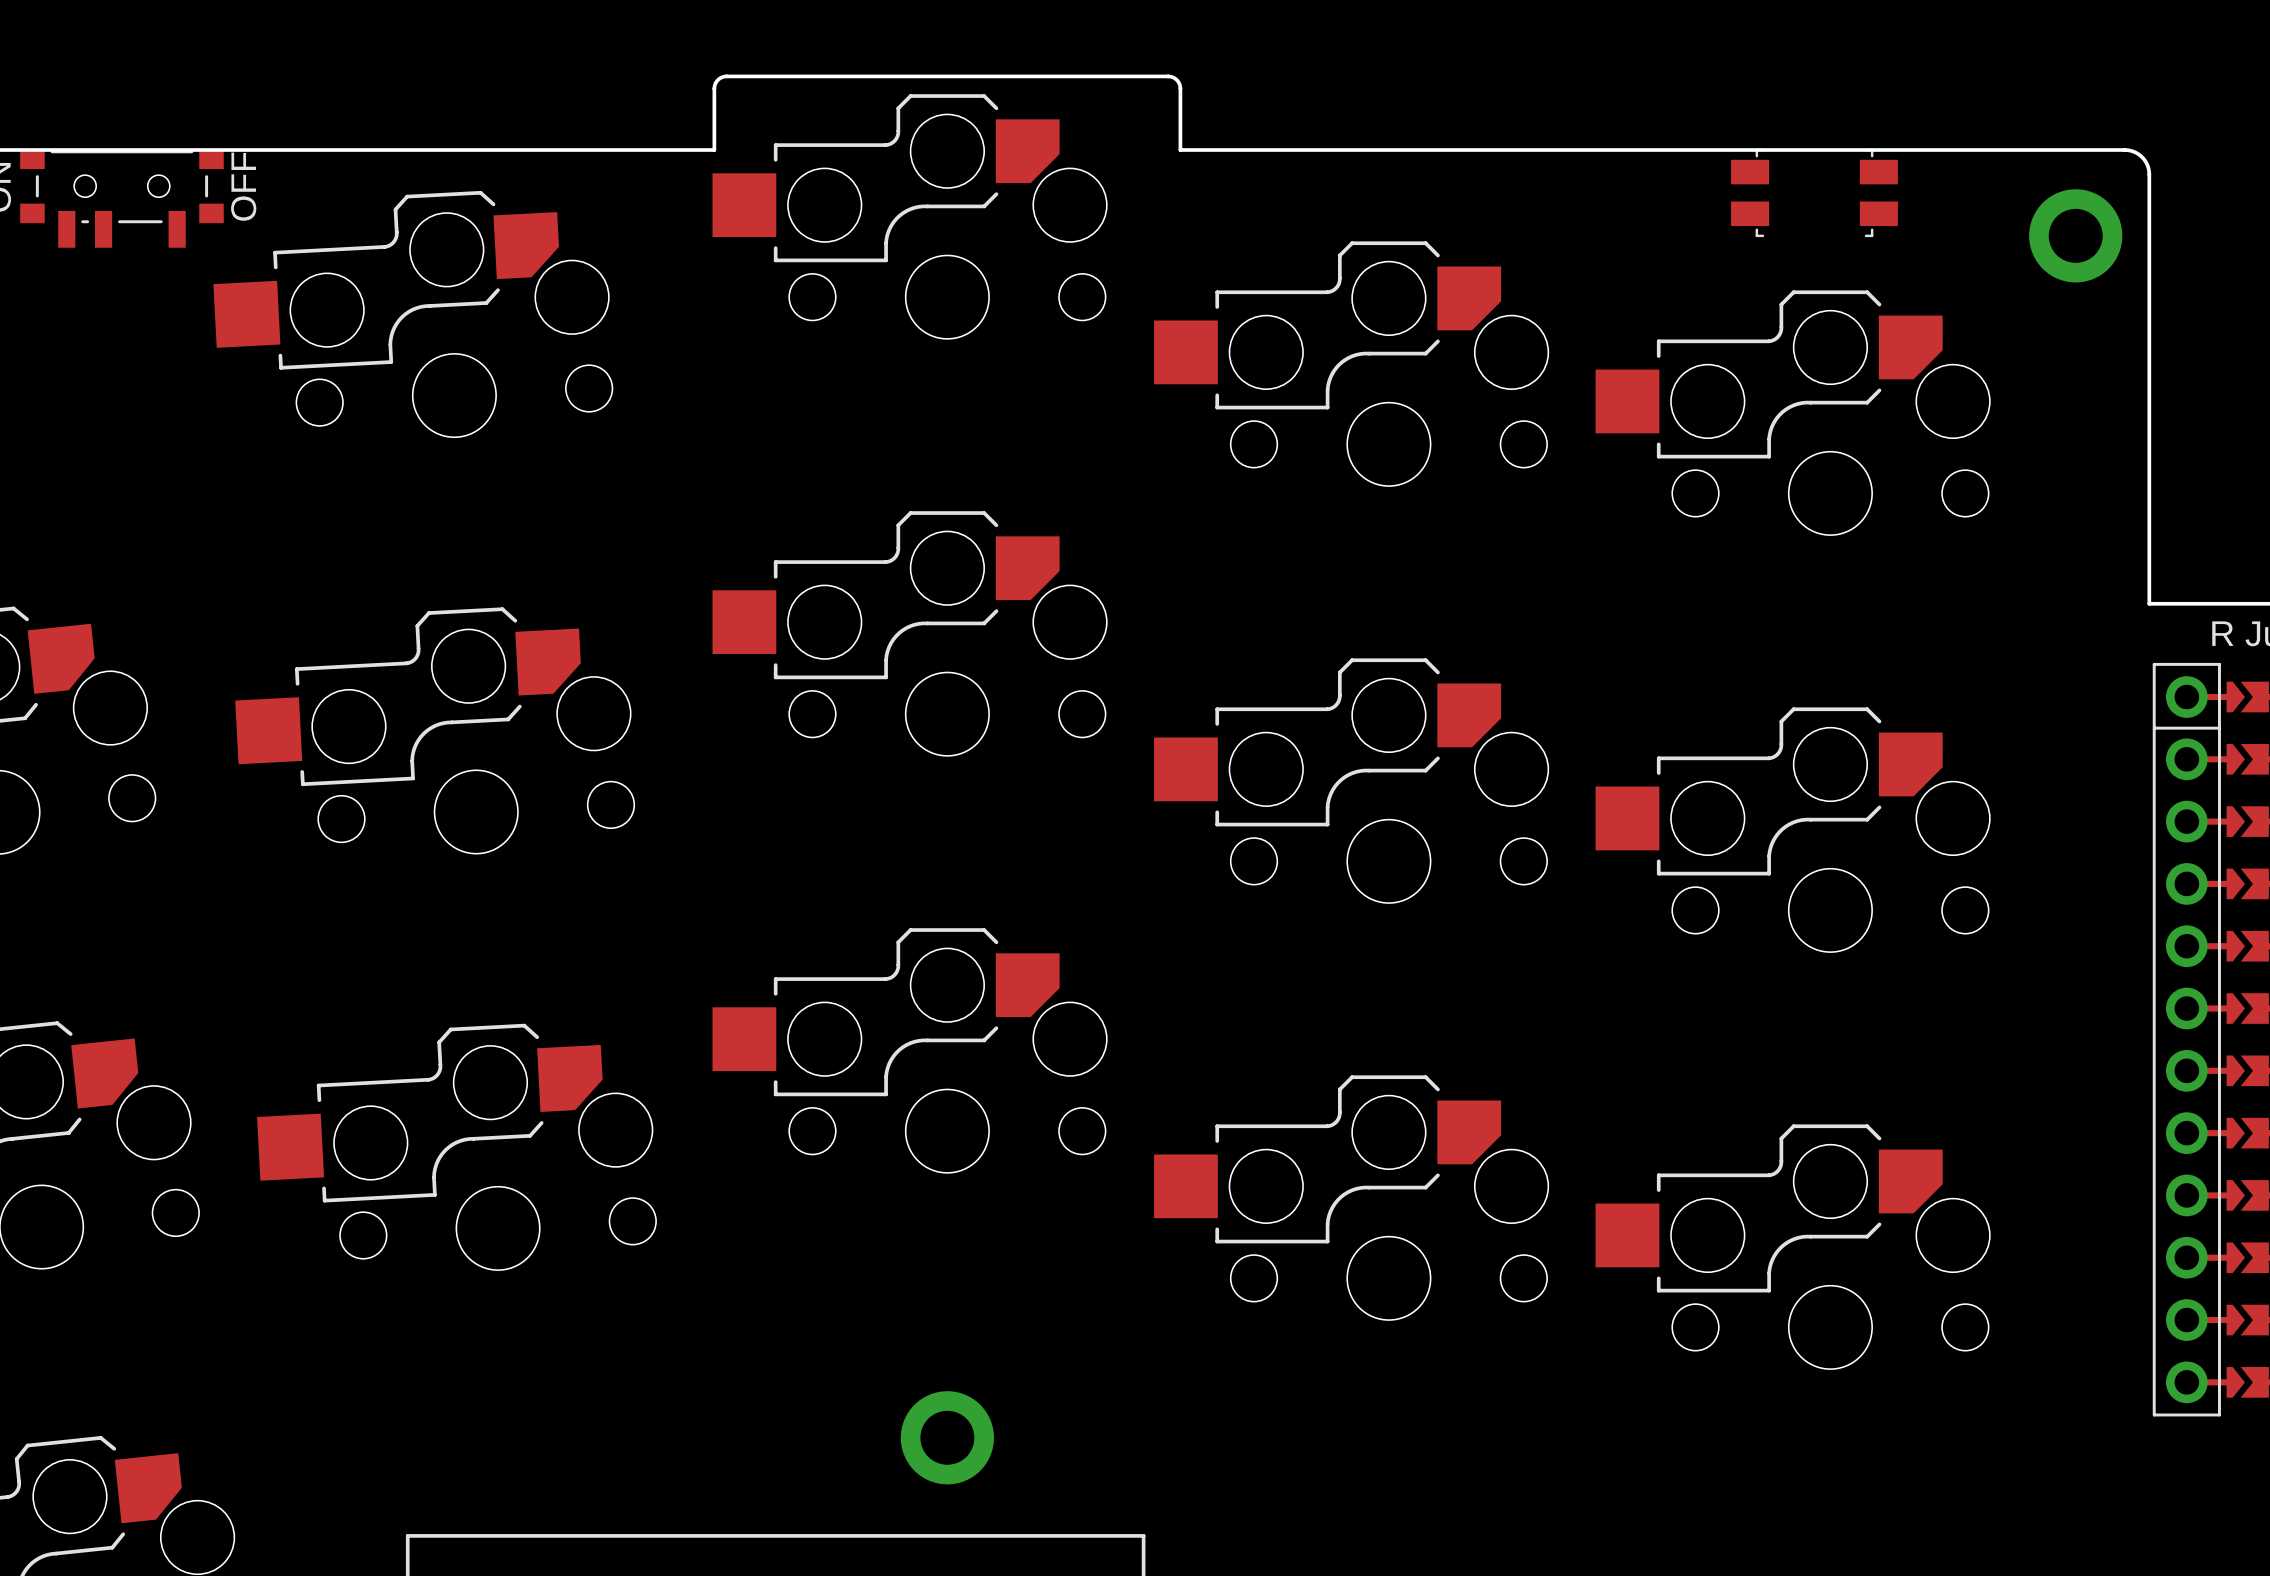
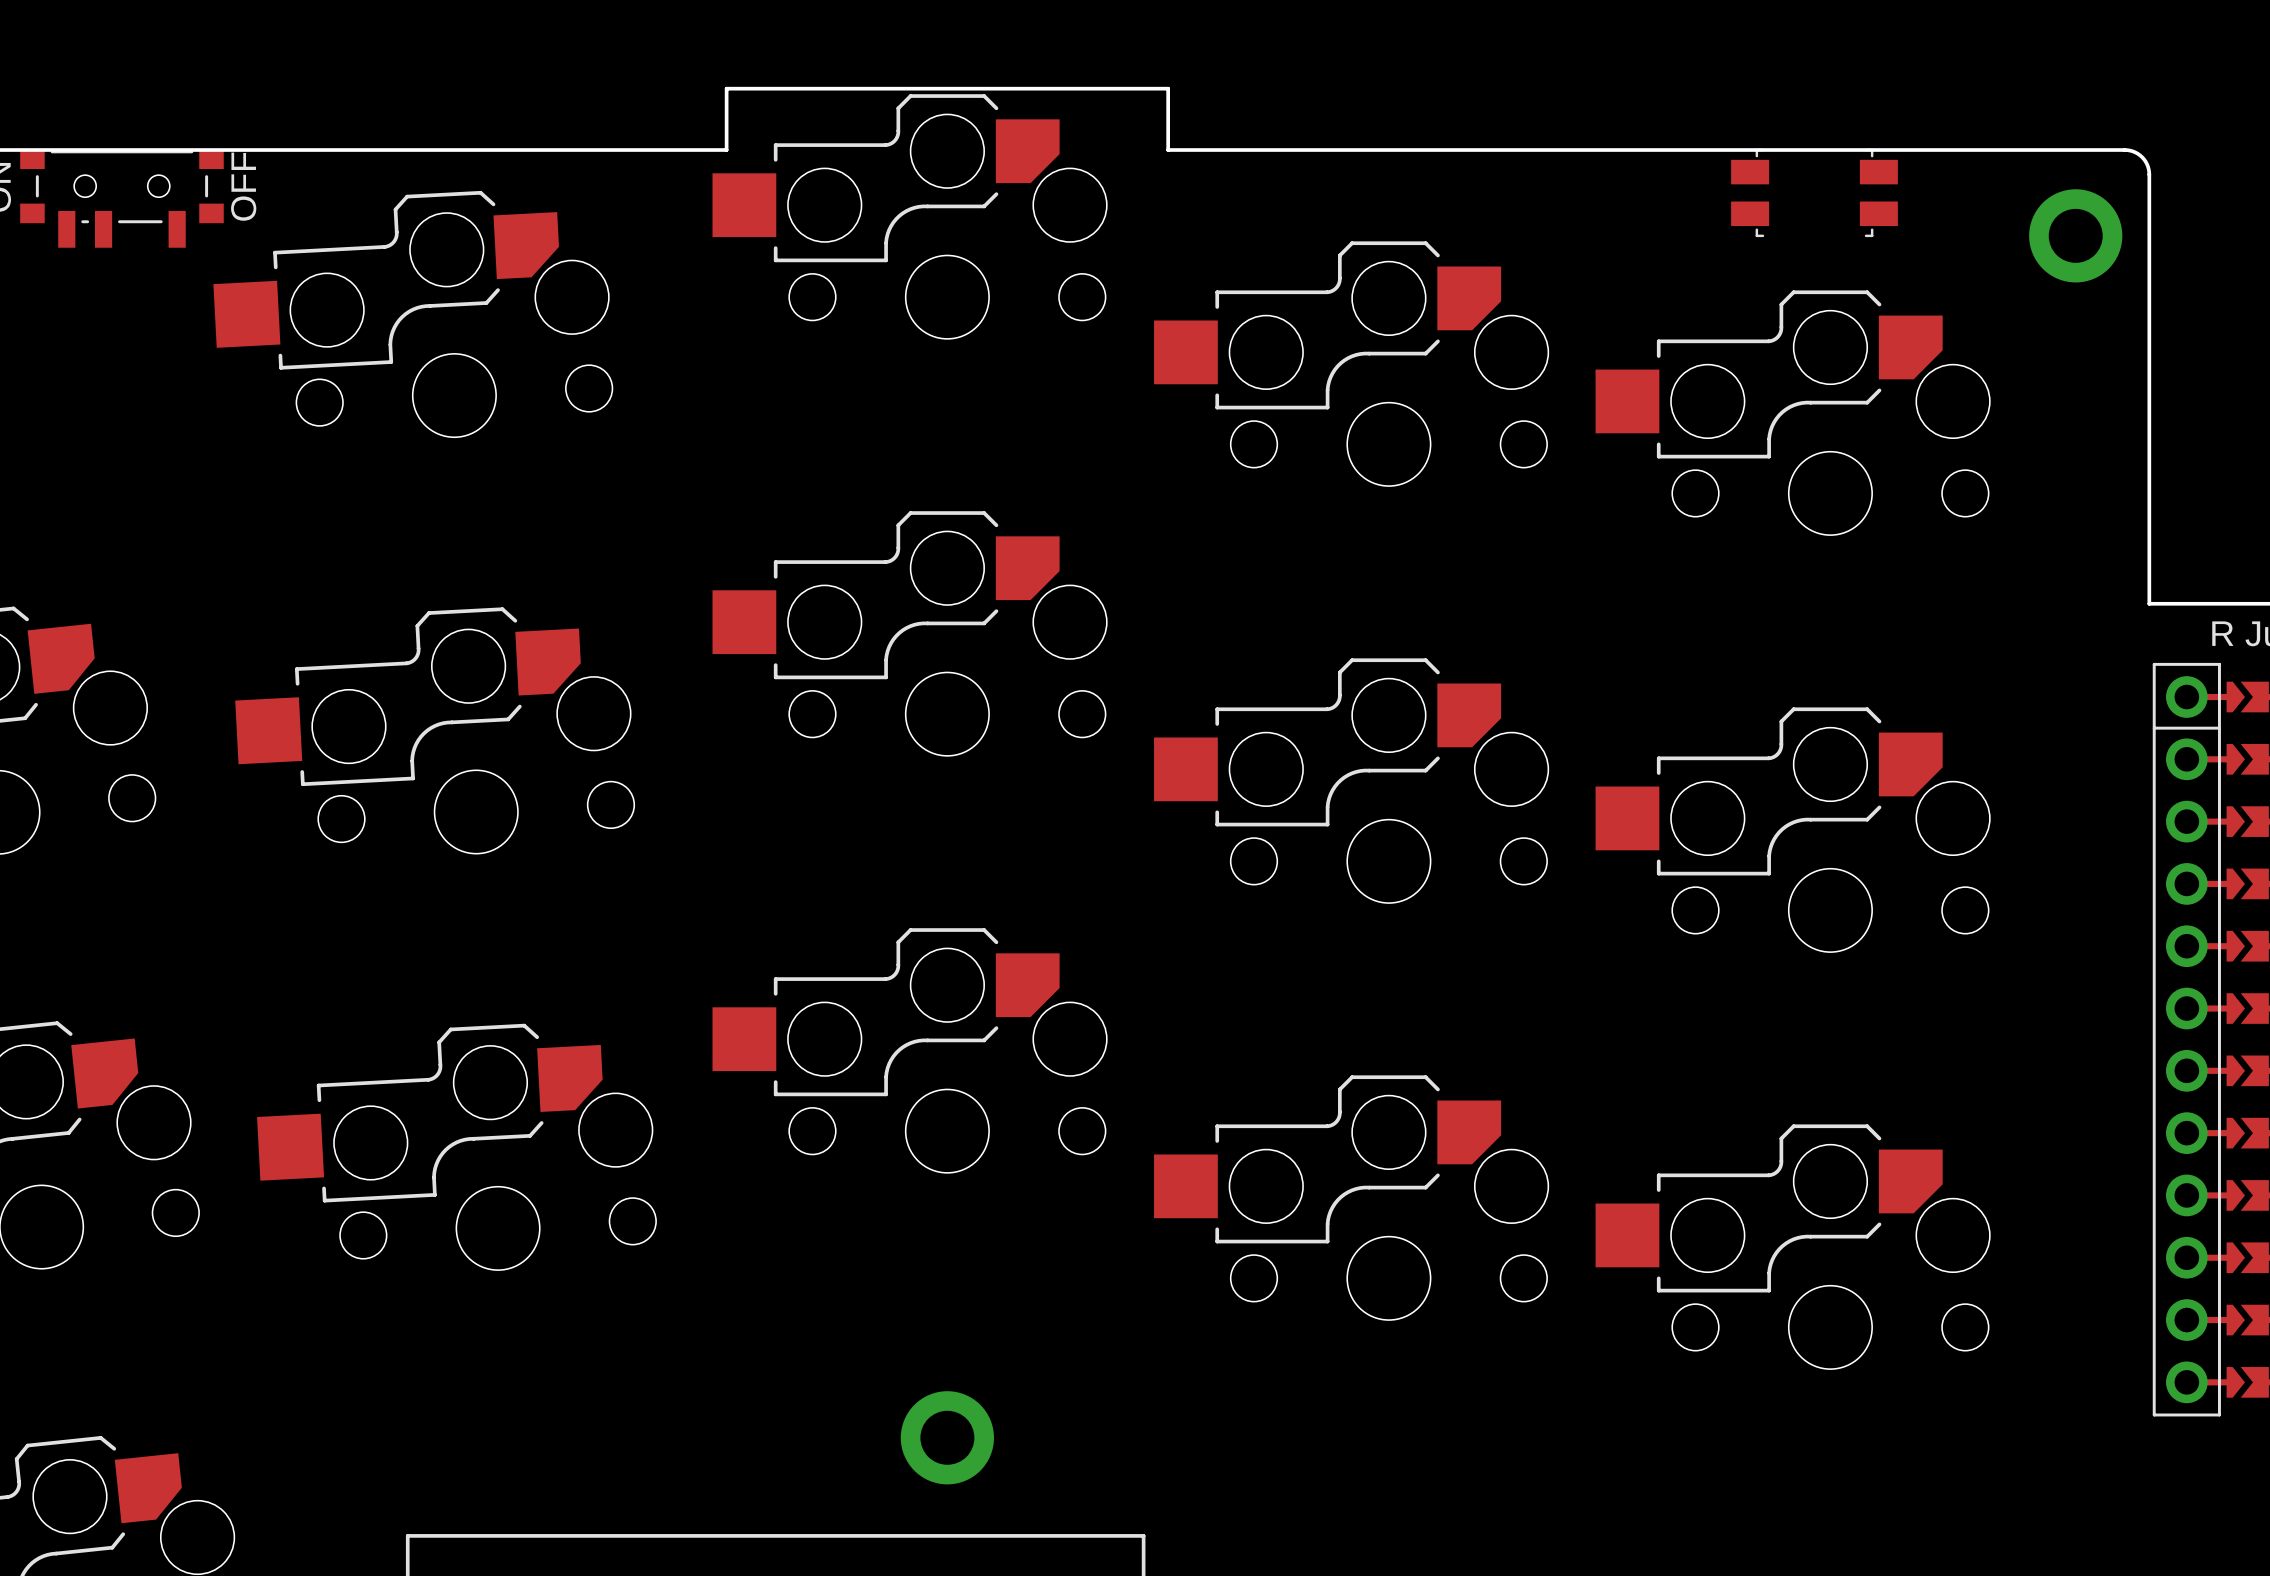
board edge: (714, 150) (714, 87) (717, 80) (726, 76) (1169, 76) (1176, 80) (1180, 87) (1180, 150) -> (714, 150) (726, 150) (726, 88) (1168, 88) (1168, 150) (1180, 150)

